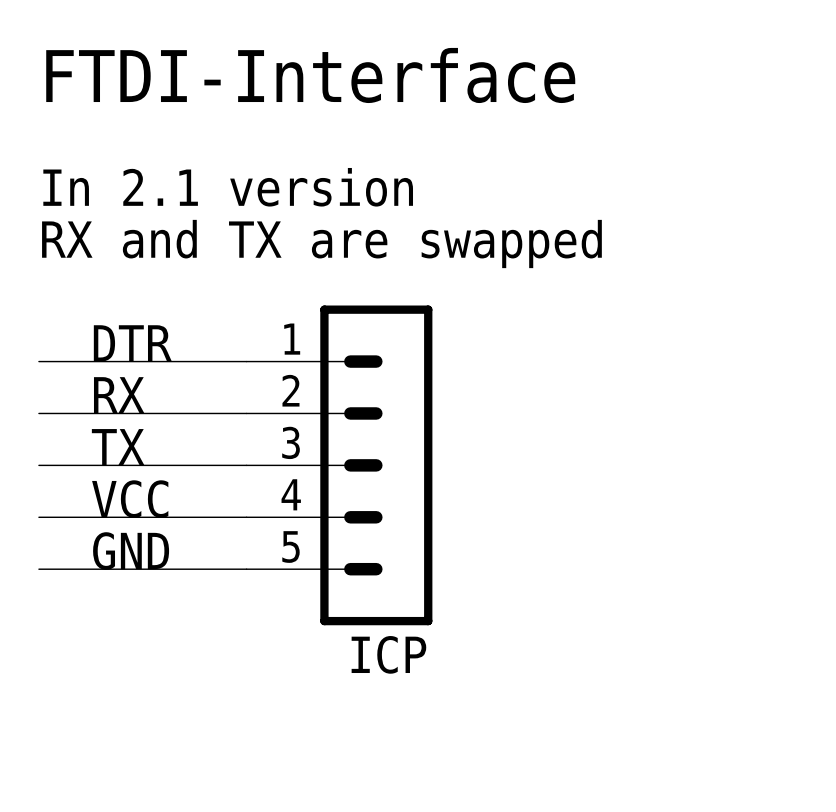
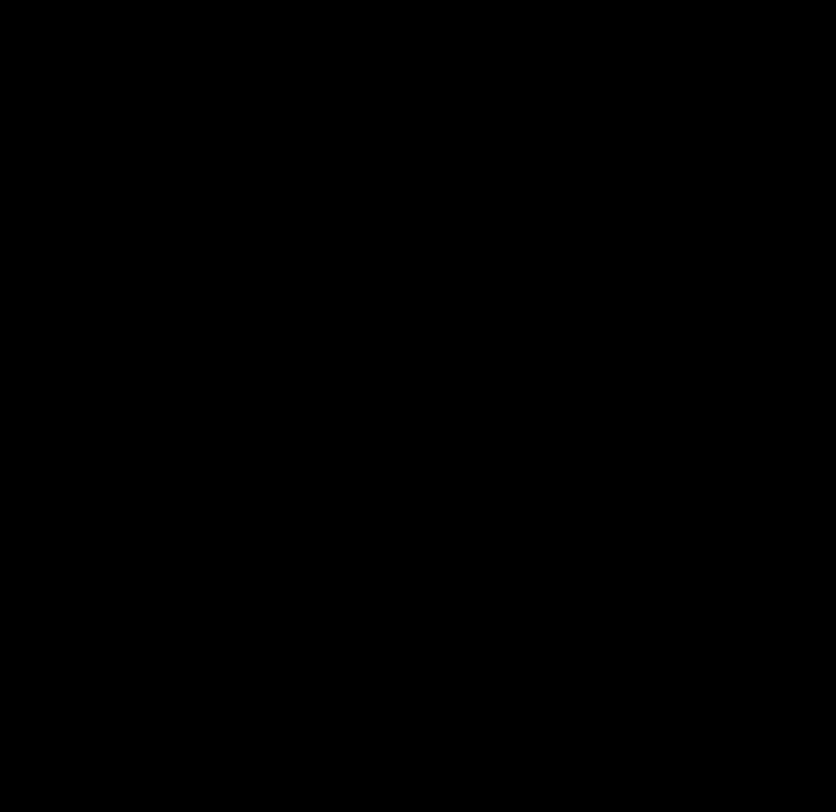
text: FTDI-Interface (310, 75) -> none
text: In 2.1 version (228, 187) -> none
text: RX and TX are swapped (321, 244) -> none
label: DTR (132, 343) -> none
wire: (38, 361) (246, 361) -> none
label: RX (119, 395) -> none
wire: (38, 413) (246, 413) -> none
label: TX (118, 447) -> none
wire: (38, 465) (246, 465) -> none
ICP: (339, 465) -> none
label: VCC (130, 499) -> none
wire: (38, 517) (246, 517) -> none
label: GND (131, 551) -> none
wire: (38, 569) (246, 569) -> none

